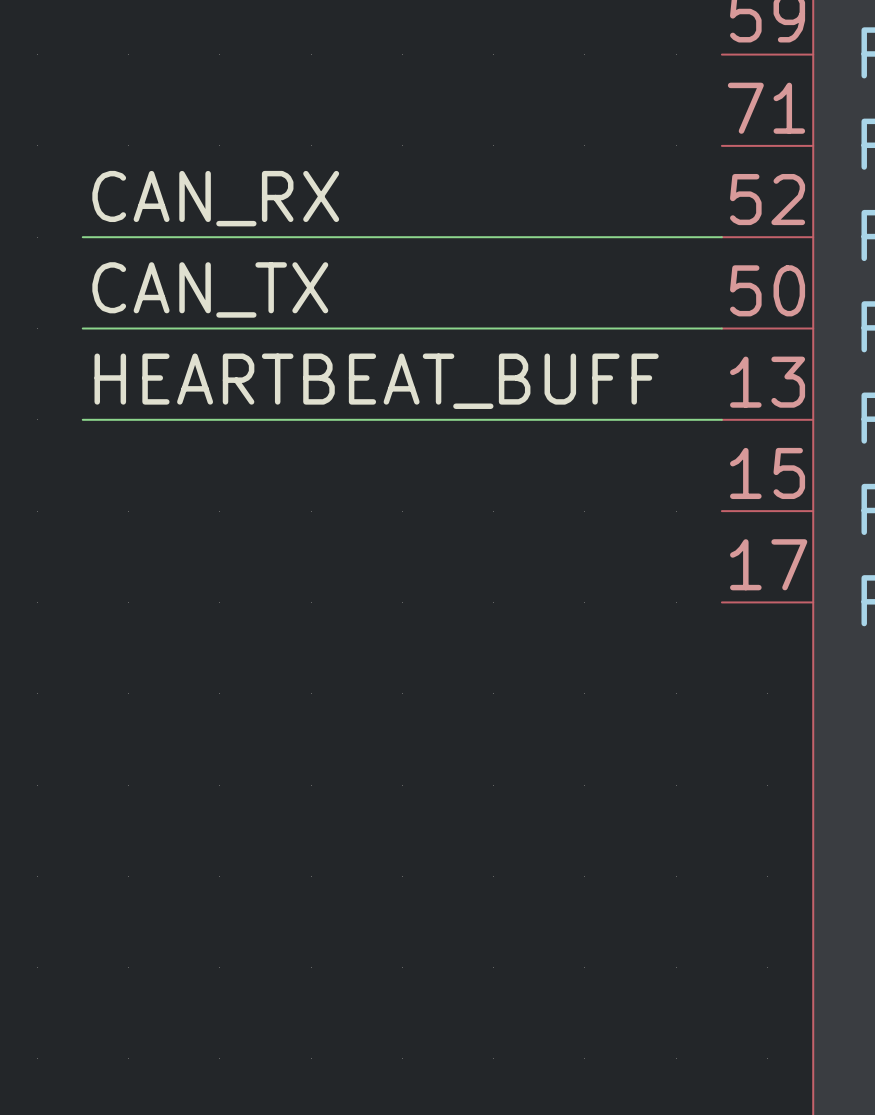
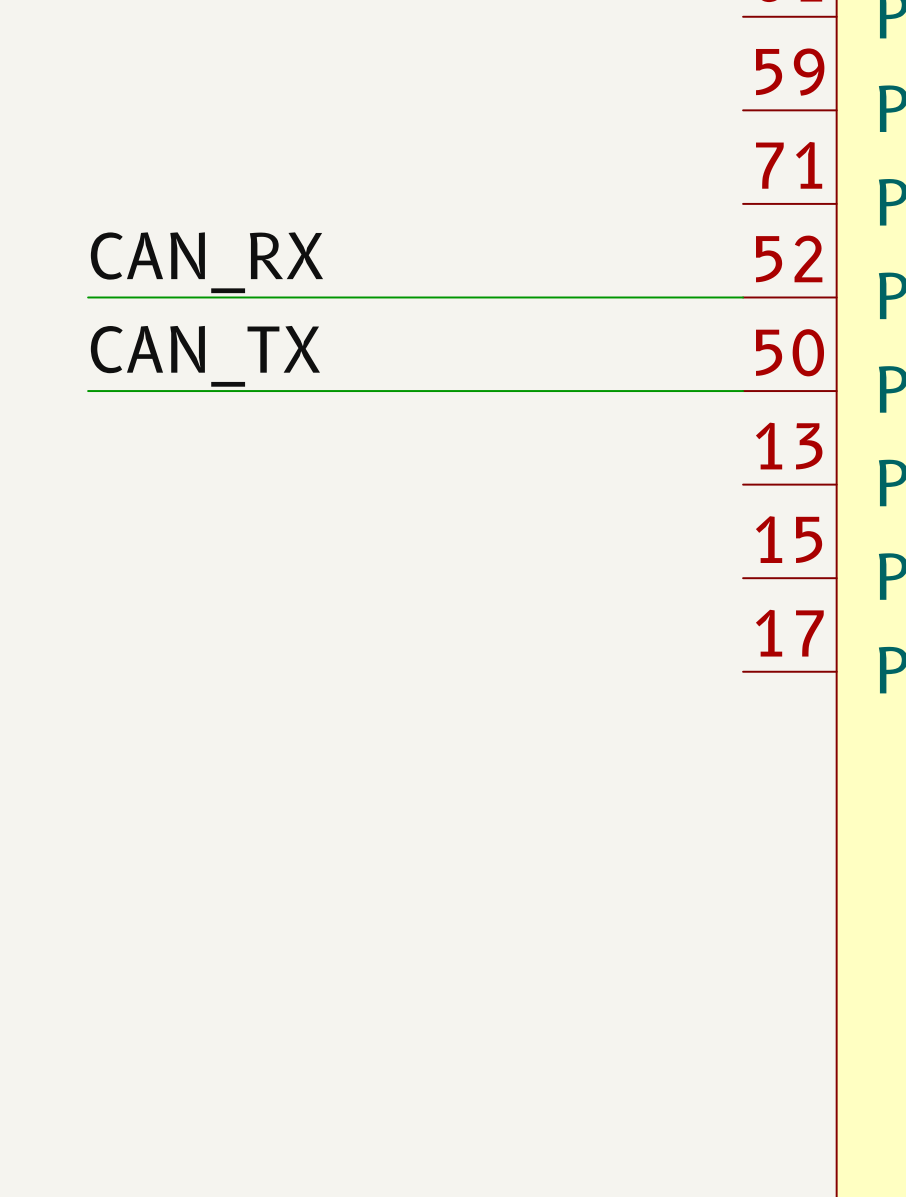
label: HEARTBEAT_BUFF (376, 381) -> none
wire: (82, 419) (721, 419) -> none

